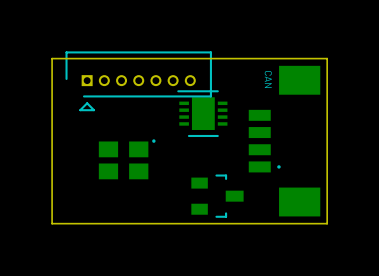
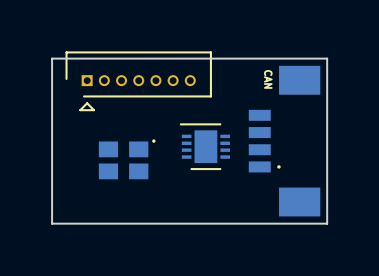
part position: (202, 113) -> (204, 146)
part: (217, 196) -> none

